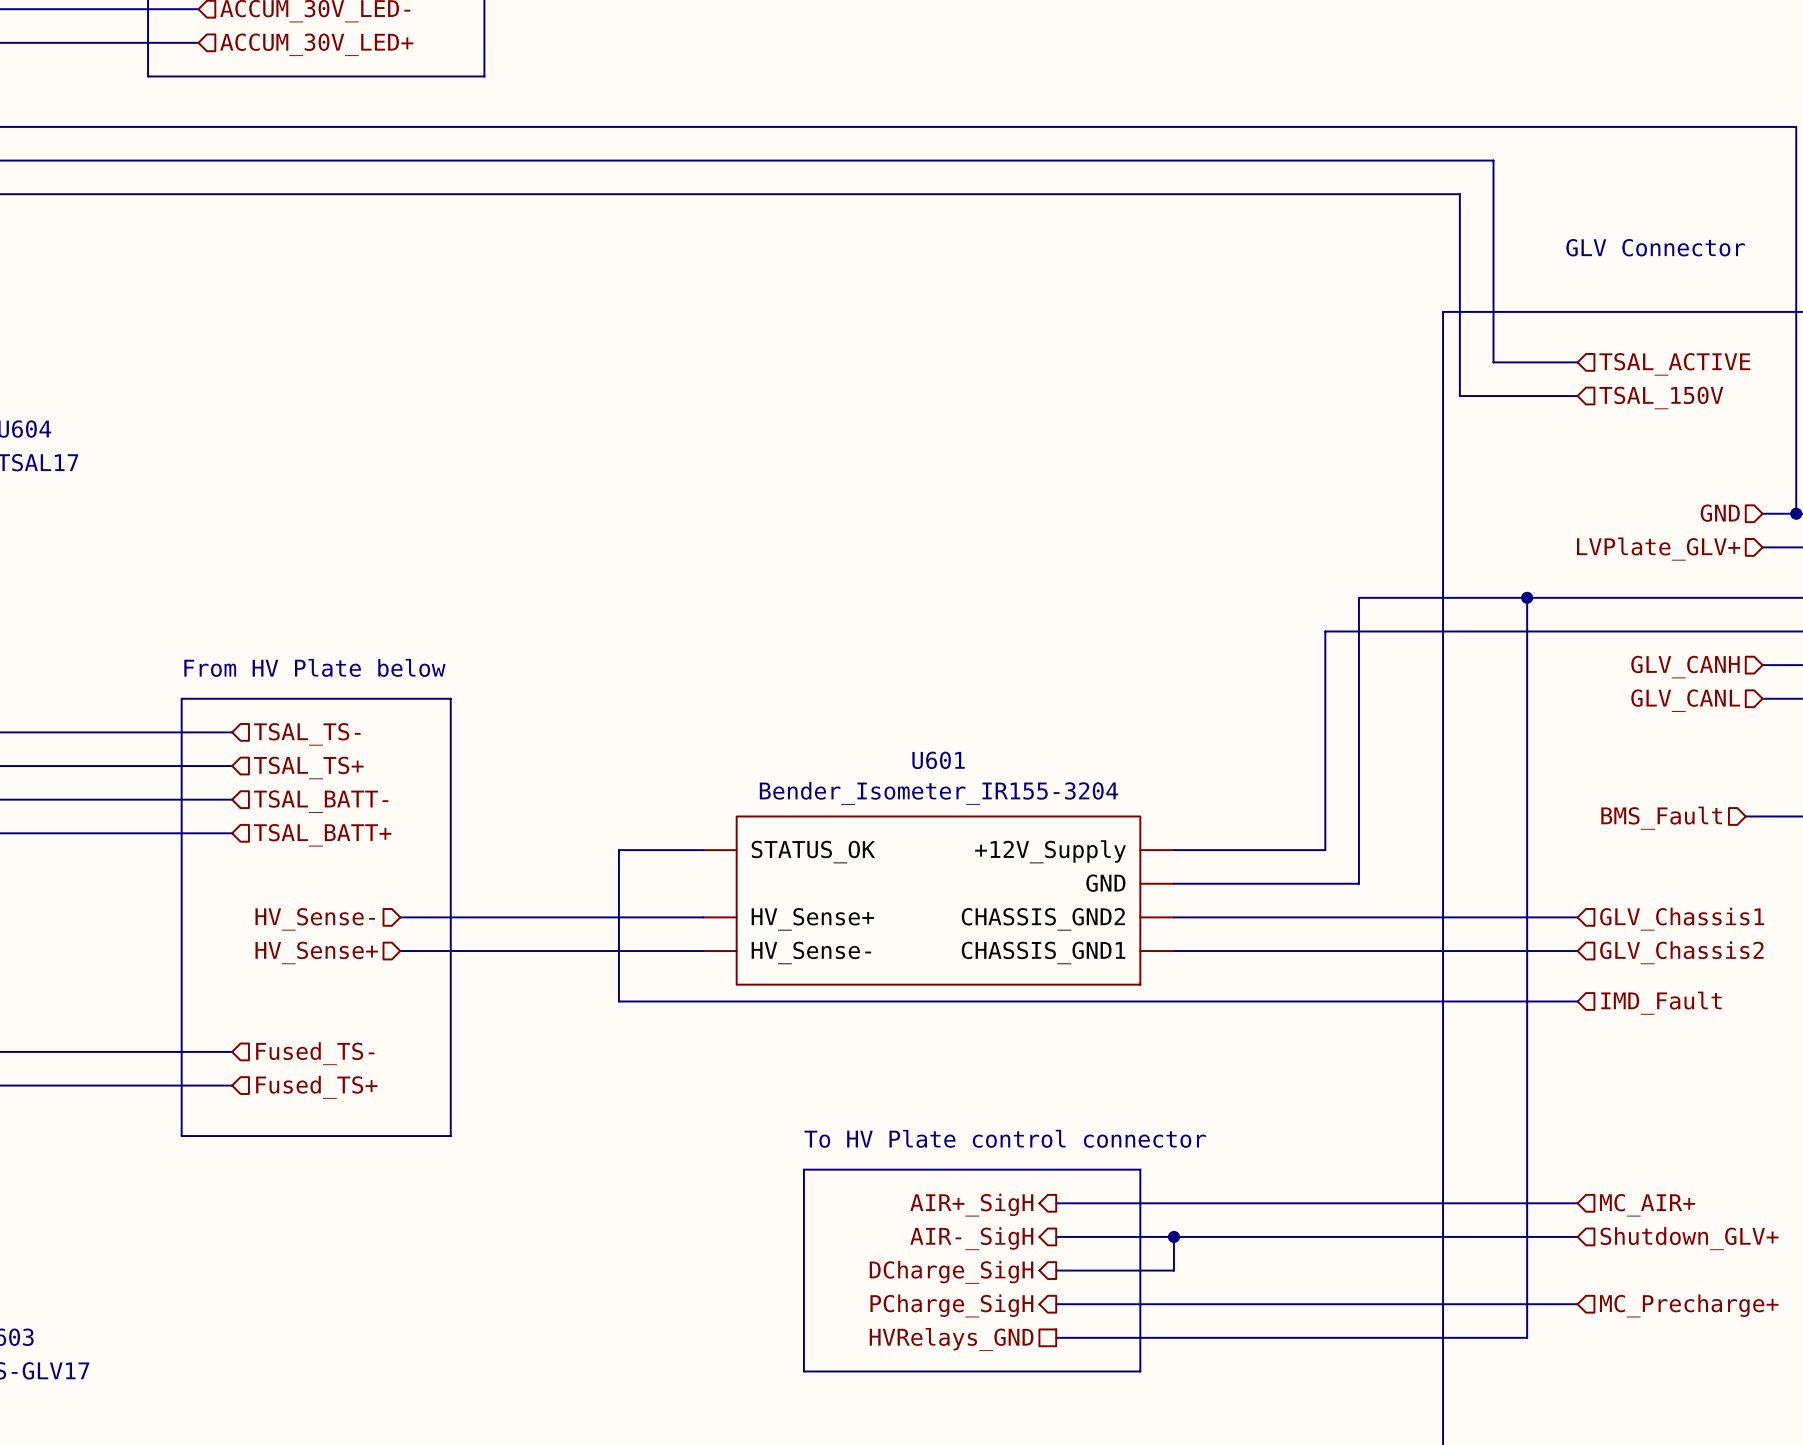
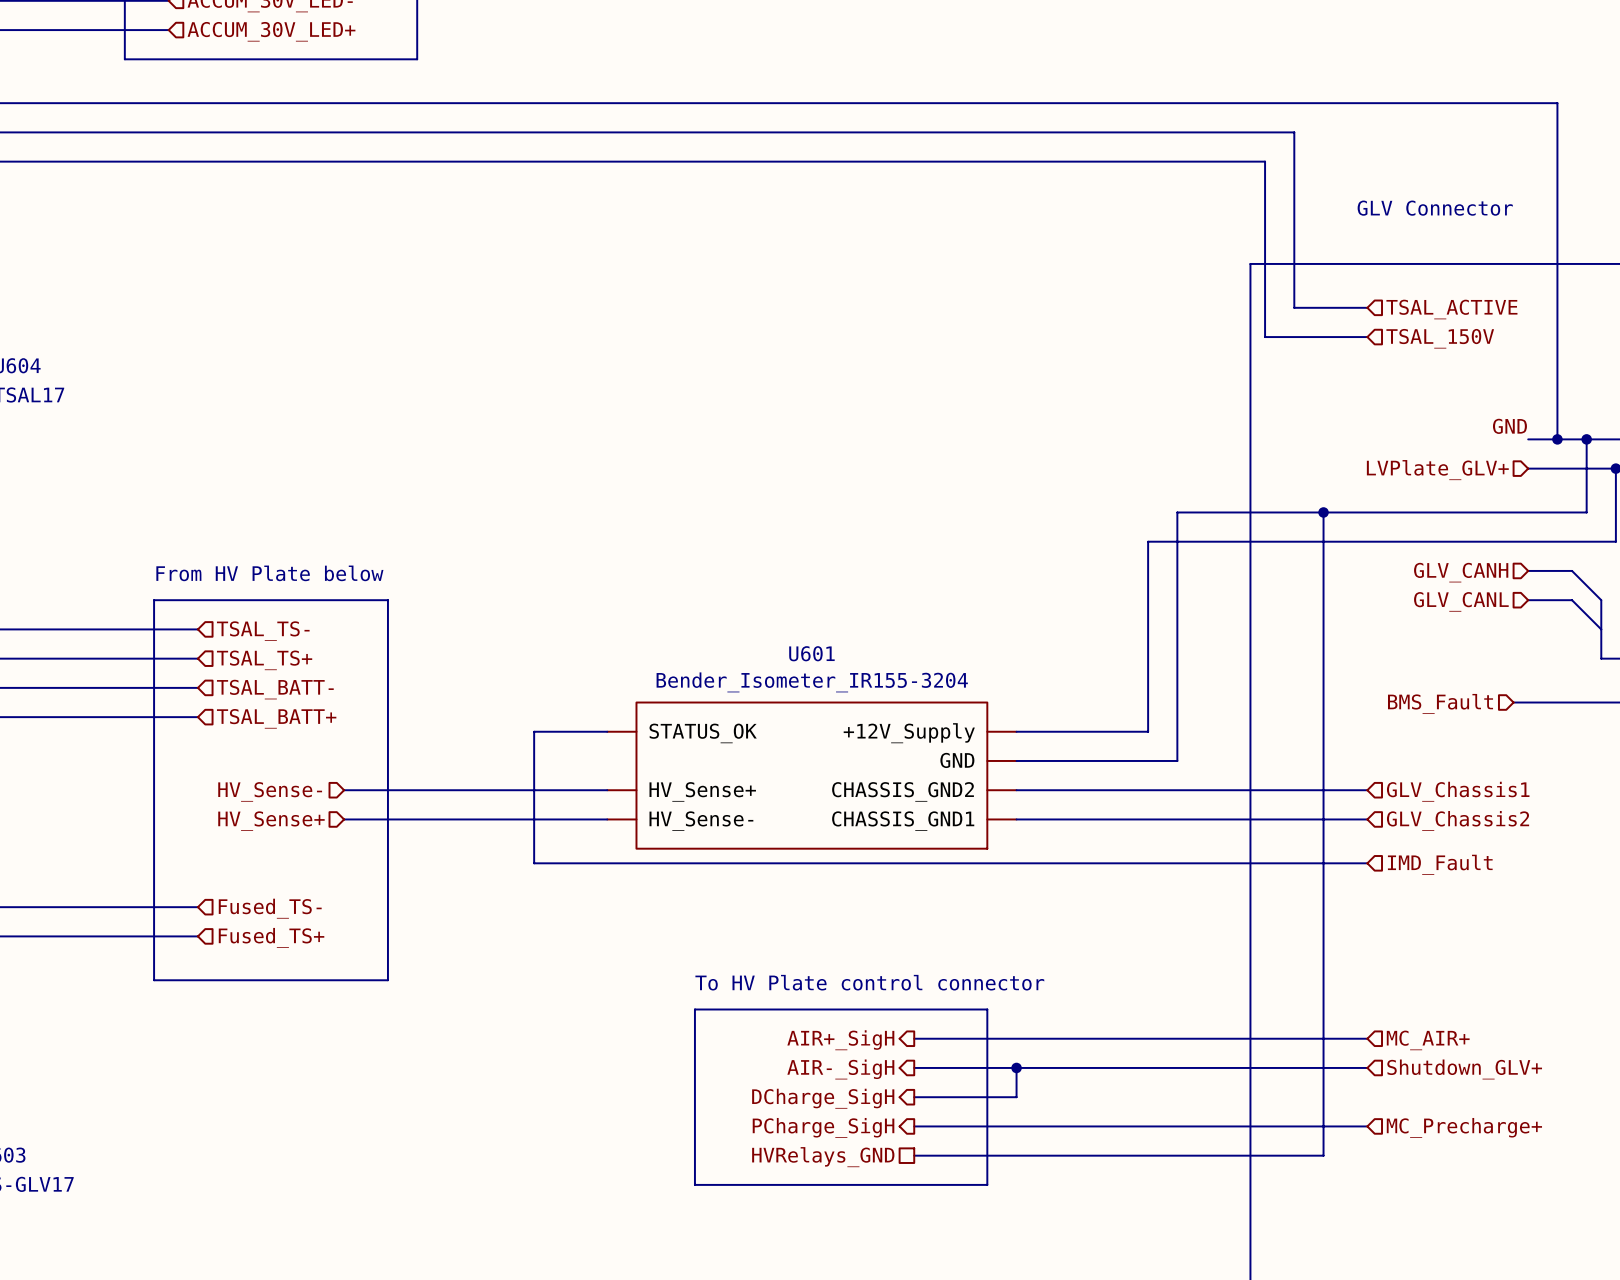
label: none -> GND (1509, 426)
hierarchical label: GND (1720, 513) -> none

